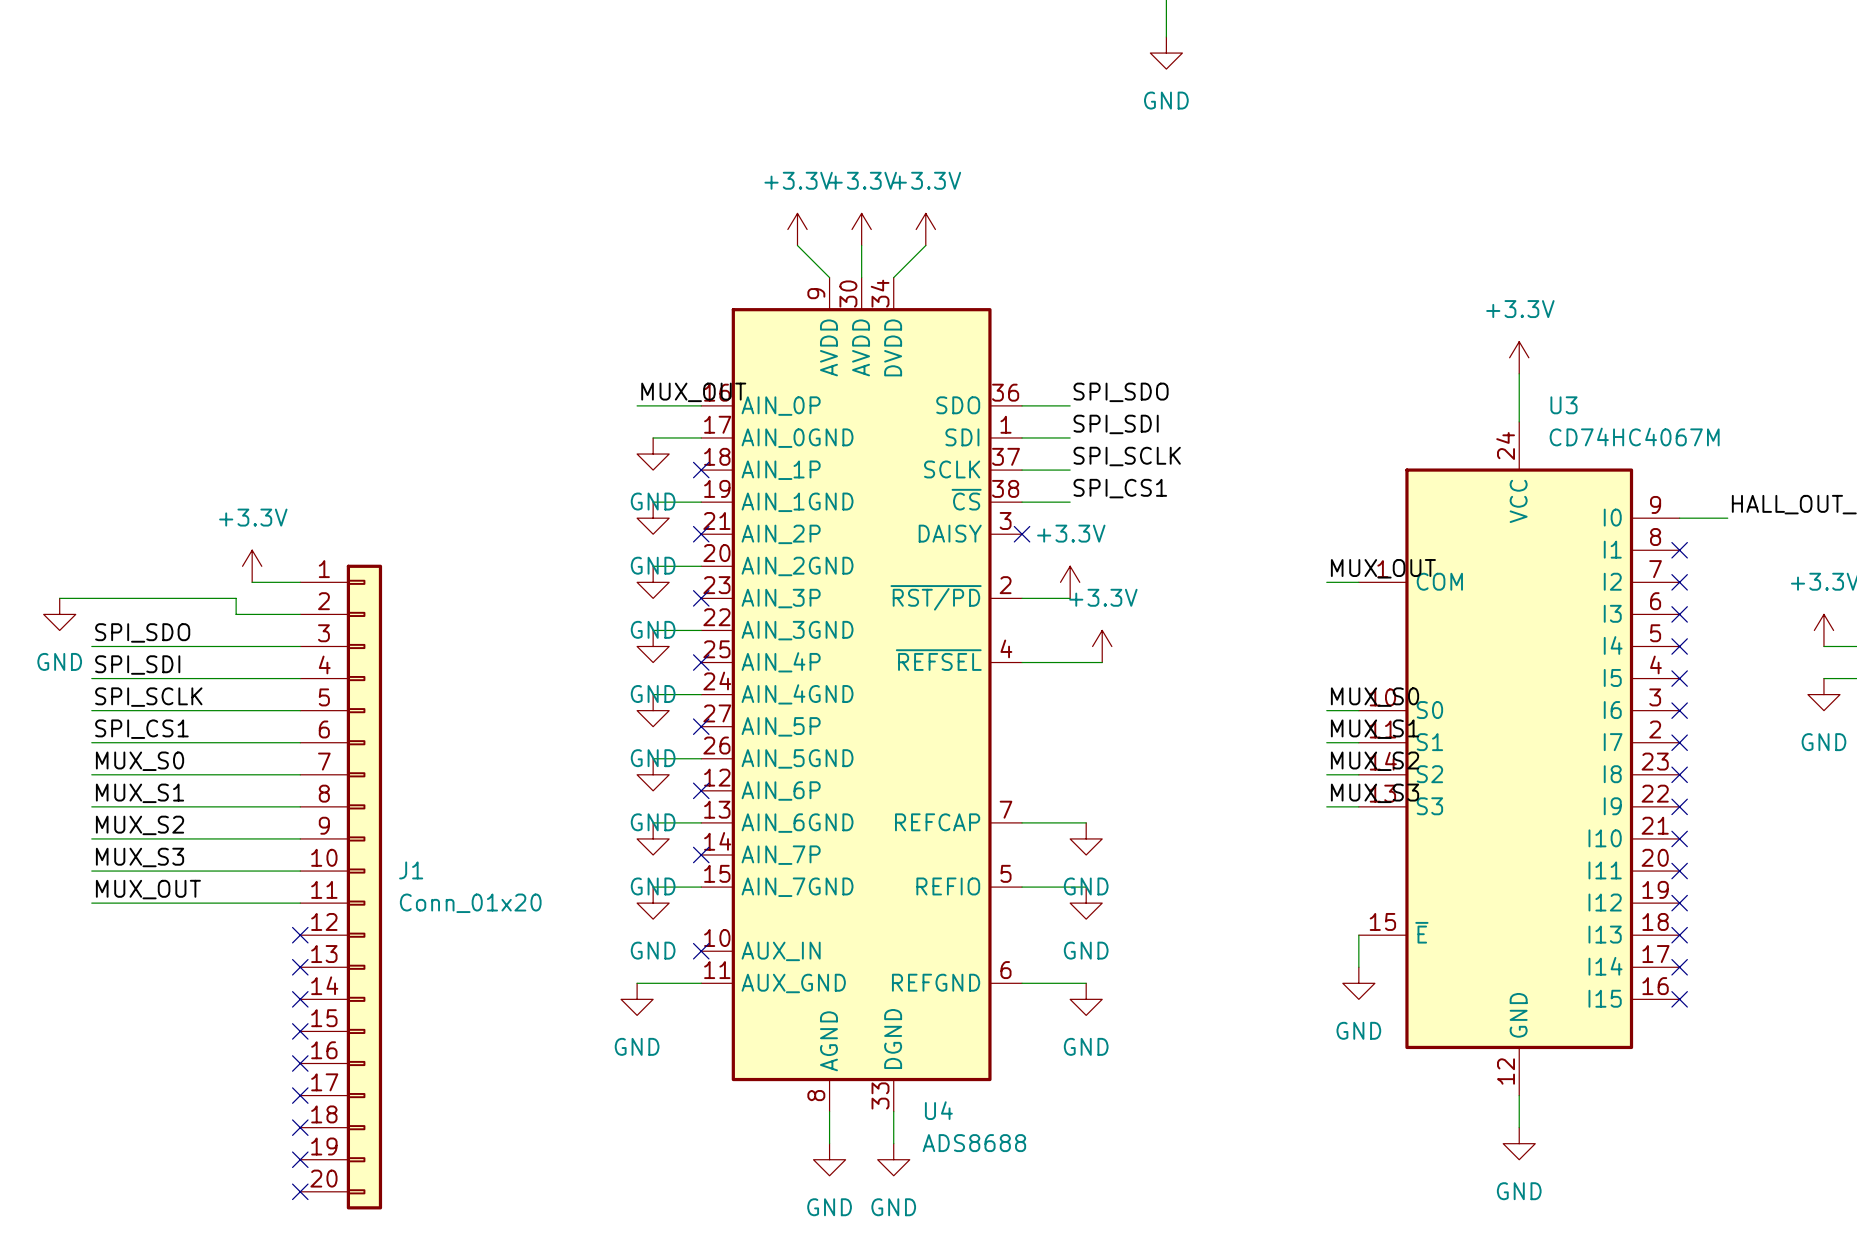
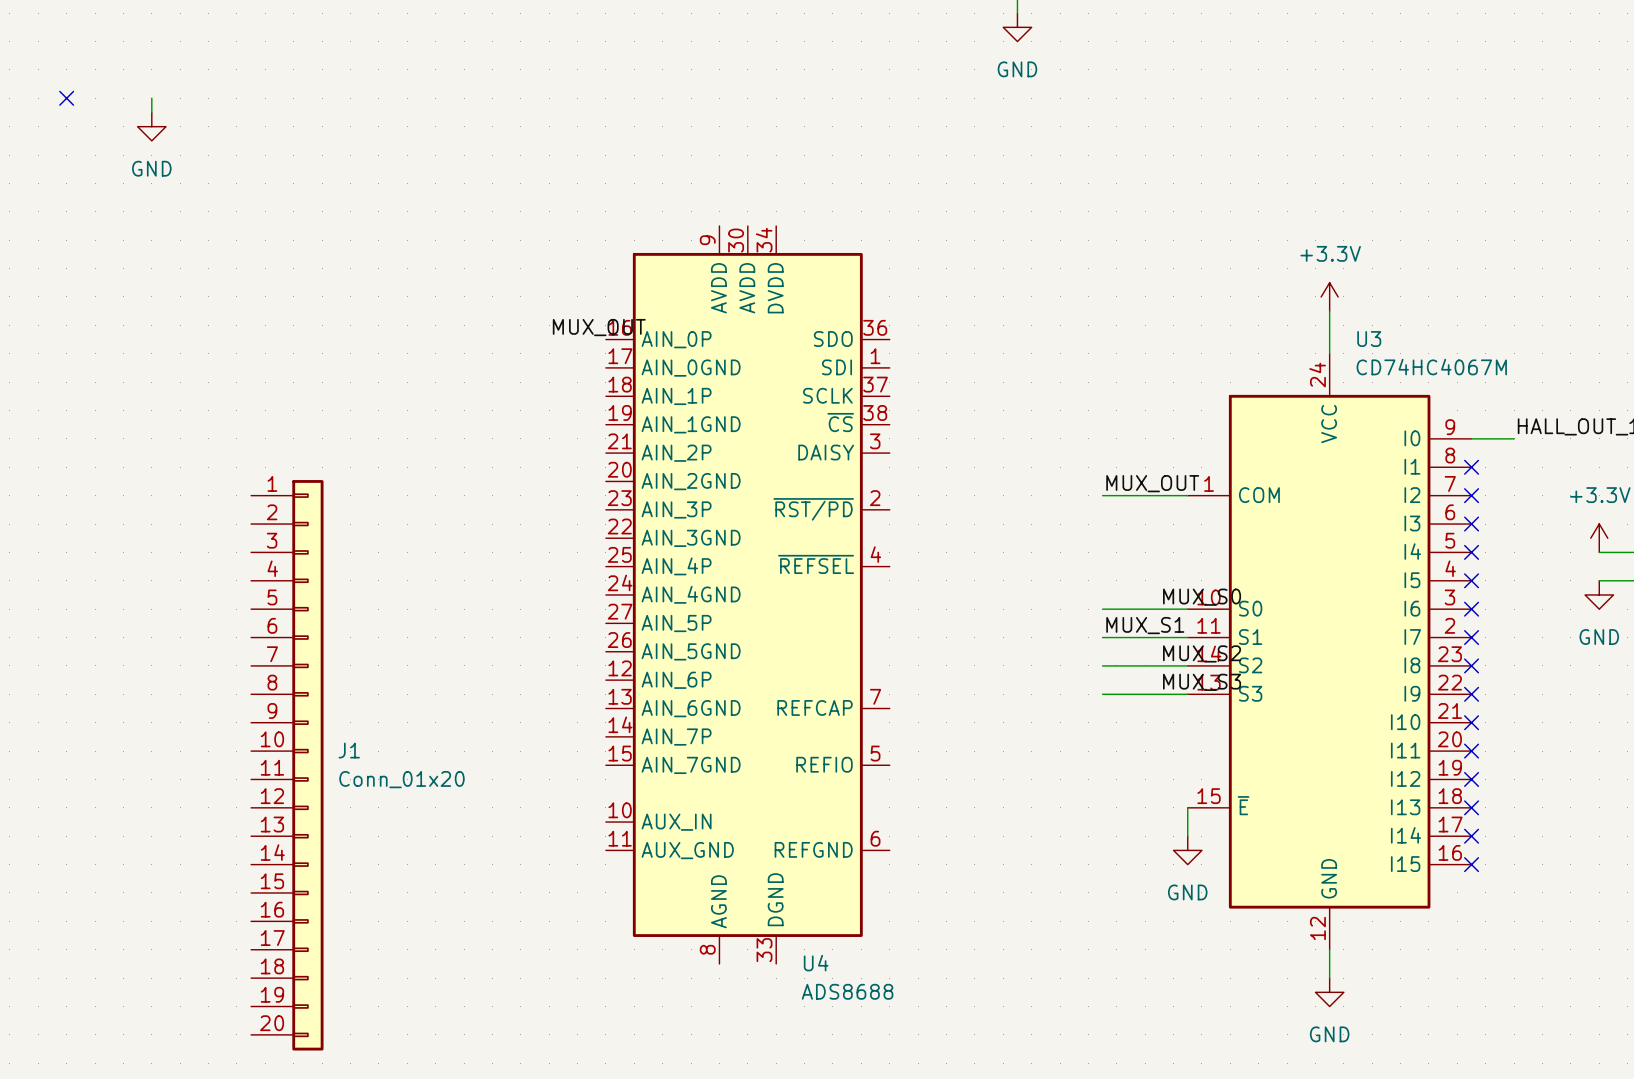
no-connect mark: none -> (66, 98)
wire: none -> (151, 98) (151, 112)
power symbol: none -> GND (151, 126)
power symbol: +3.3V (797, 229) -> none
power symbol: +3.3V (861, 229) -> none
power symbol: +3.3V (925, 229) -> none
wire: (797, 245) (829, 277) -> none
wire: (861, 245) (861, 277) -> none
wire: (925, 245) (893, 277) -> none
label: SPI_SDO (1121, 392) -> none
wire: (637, 405) (701, 405) -> none
wire: (1022, 405) (1070, 405) -> none
label: SPI_SDI (1116, 424) -> none
wire: (653, 437) (701, 437) -> none
wire: (1022, 437) (1070, 437) -> none
power symbol: GND (653, 454) -> none
label: SPI_SCLK (1127, 456) -> none
no-connect mark: (701, 470) -> none
wire: (1022, 470) (1070, 470) -> none
label: SPI_CS1 (1120, 488) -> none
wire: (653, 502) (701, 502) -> none
wire: (1022, 502) (1070, 502) -> none
power symbol: GND (653, 518) -> none
no-connect mark: (701, 534) -> none
no-connect mark: (1022, 534) -> none
power symbol: +3.3V (252, 566) -> none
wire: (653, 566) (701, 566) -> none
label position: MUX_OUT (1383, 568) -> MUX_OUT (1152, 483)
wire: (252, 582) (300, 582) -> none
power symbol: GND (653, 582) -> none
power symbol: +3.3V (1070, 582) -> none
wire: none -> (1102, 495) (1159, 495)
wire: (59, 598) (236, 598) (236, 614) (300, 614) -> none
no-connect mark: (701, 598) -> none
wire: (1022, 598) (1070, 598) -> none
power symbol: GND (59, 614) -> none
wire: (653, 630) (701, 630) -> none
label: SPI_SDO (142, 632) -> none
wire: (91, 646) (300, 646) -> none
power symbol: GND (653, 646) -> none
power symbol: +3.3V (1102, 646) -> none
no-connect mark: (701, 662) -> none
wire: (1022, 662) (1102, 662) -> none
label: SPI_SDI (137, 665) -> none
wire: (91, 678) (300, 678) -> none
wire: (653, 694) (701, 694) -> none
label: SPI_SCLK (148, 697) -> none
wire: (91, 710) (300, 710) -> none
power symbol: GND (653, 710) -> none
wire: none -> (1102, 609) (1159, 609)
no-connect mark: (701, 726) -> none
label: SPI_CS1 (141, 729) -> none
label position: MUX_S1 (1375, 729) -> MUX_S1 (1145, 625)
wire: (91, 742) (300, 742) -> none
wire: (653, 758) (701, 758) -> none
label: MUX_S0 (140, 761) -> none
wire: (91, 774) (300, 774) -> none
power symbol: GND (653, 774) -> none
wire: none -> (1102, 665) (1159, 665)
no-connect mark: (701, 790) -> none
label: MUX_S1 (140, 793) -> none
wire: (91, 806) (300, 806) -> none
wire: (653, 822) (701, 822) -> none
wire: (1022, 822) (1086, 822) -> (1102, 637) (1159, 637)
label: MUX_S2 (140, 825) -> none
wire: (91, 838) (300, 838) -> none
power symbol: GND (653, 838) -> none
power symbol: GND (1086, 838) -> none
no-connect mark: (701, 854) -> none
label: MUX_S3 (140, 857) -> none
wire: (91, 871) (300, 871) -> none
wire: (653, 887) (701, 887) -> none
wire: (1022, 887) (1086, 887) -> (1102, 694) (1159, 694)
label: MUX_OUT (148, 889) -> none
wire: (91, 903) (300, 903) -> none
power symbol: GND (653, 903) -> none
power symbol: GND (1086, 903) -> none
no-connect mark: (300, 935) -> none
no-connect mark: (701, 951) -> none
no-connect mark: (300, 967) -> none
wire: (637, 983) (701, 983) -> none
wire: (1022, 983) (1086, 983) -> none
no-connect mark: (300, 999) -> none
power symbol: GND (637, 999) -> none
power symbol: GND (1086, 999) -> none
no-connect mark: (300, 1031) -> none
no-connect mark: (300, 1063) -> none
no-connect mark: (300, 1095) -> none
wire: (829, 1111) (829, 1143) -> none
wire: (893, 1111) (893, 1143) -> none
no-connect mark: (300, 1127) -> none
no-connect mark: (300, 1159) -> none
power symbol: GND (829, 1159) -> none
power symbol: GND (893, 1159) -> none
no-connect mark: (300, 1191) -> none

